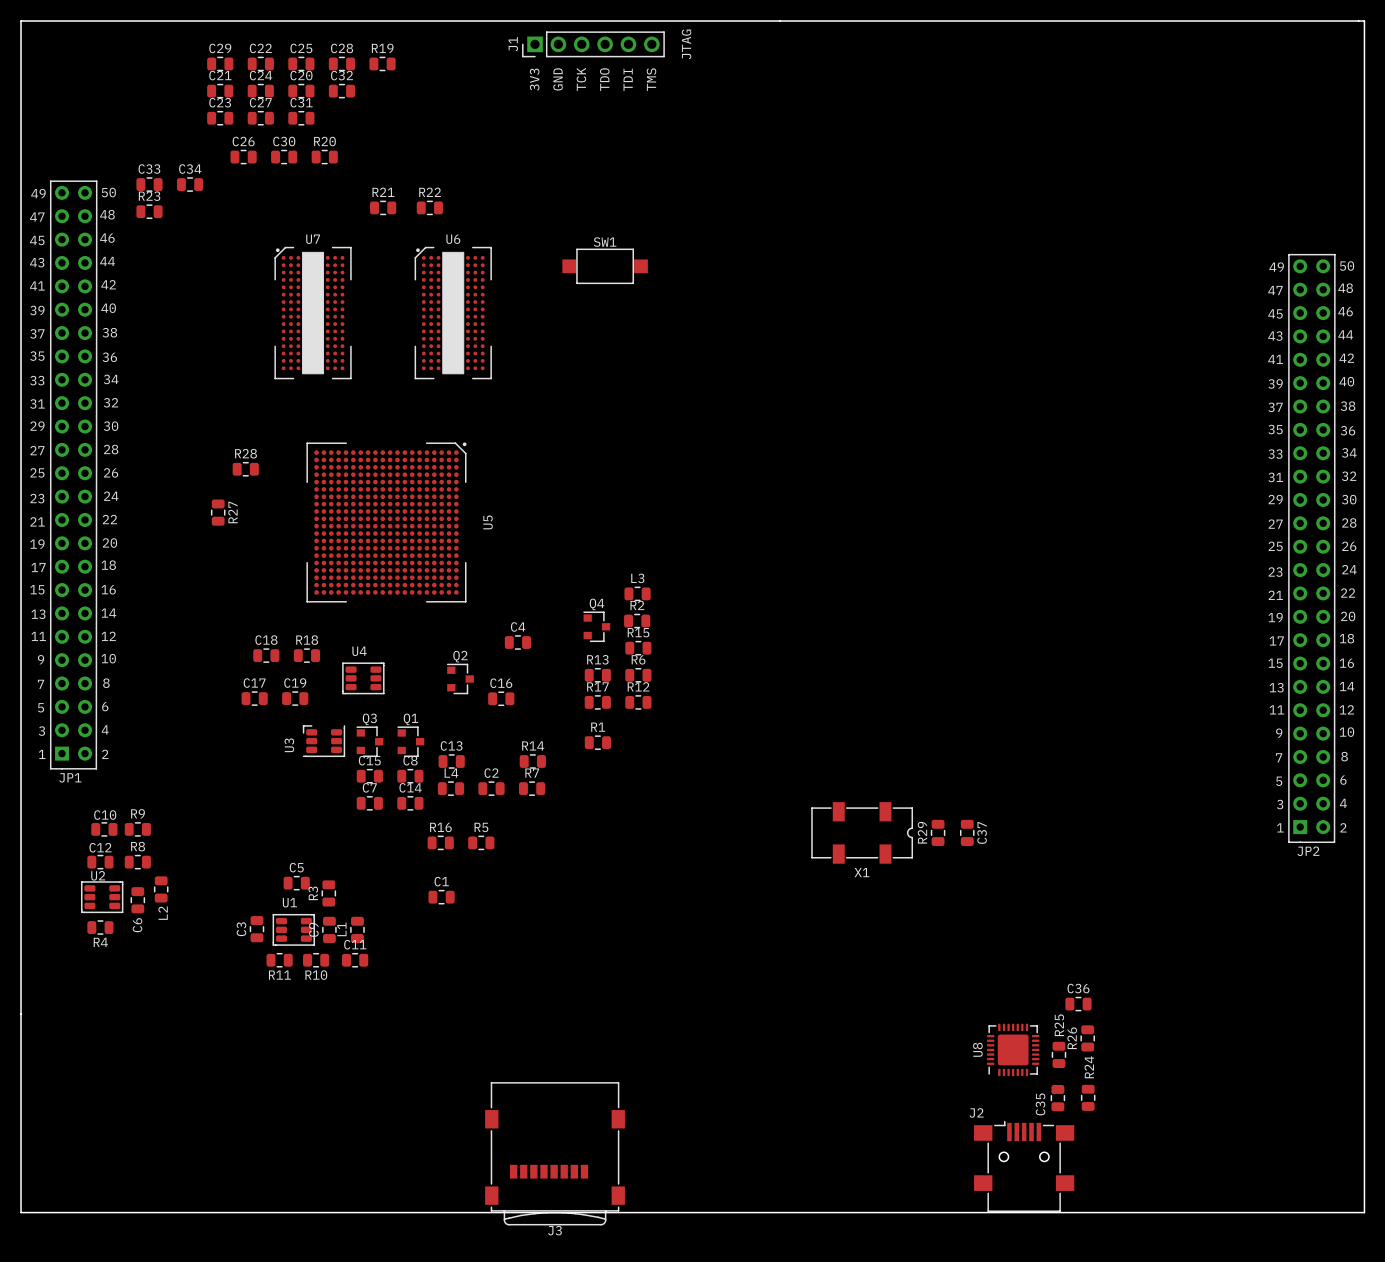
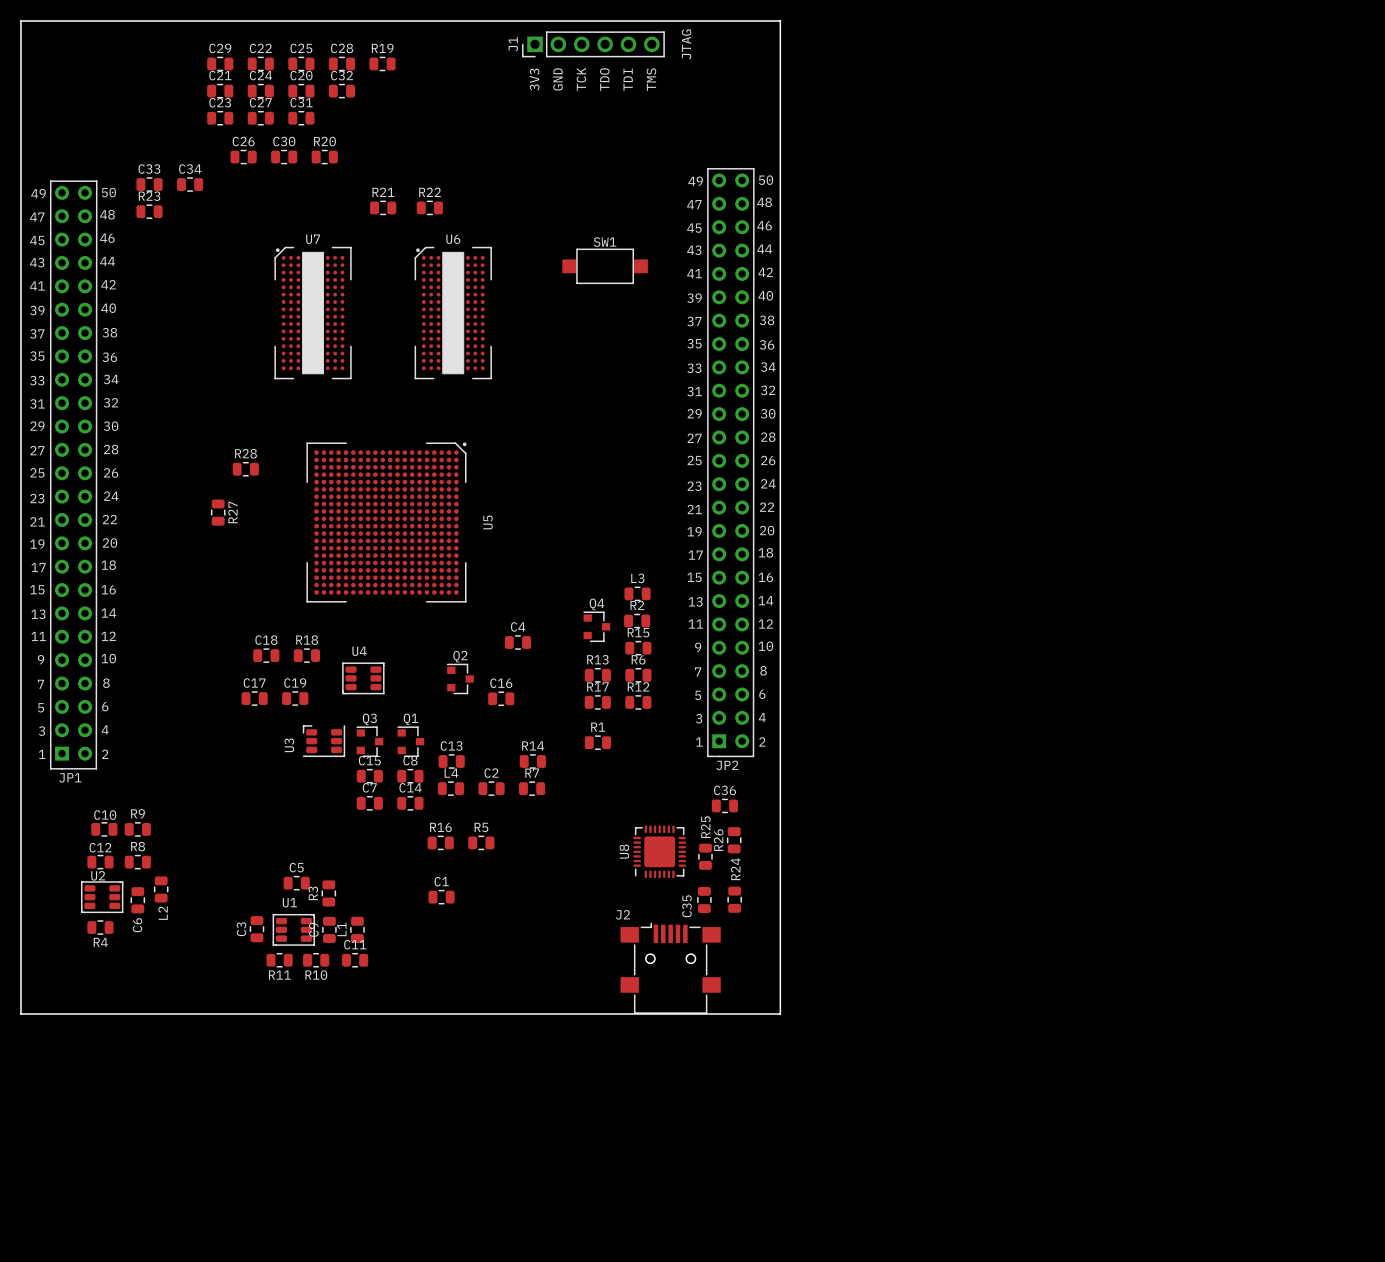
board edge: (780, 21) (1364, 21) (1364, 1212) (21, 1212) (21, 1013) -> (780, 21) (780, 1013) (21, 1013)
JP2 position: (1311, 548) -> (730, 462)
X1: (862, 832) -> none
R29: (938, 832) -> none
C37: (967, 832) -> none
C36 position: (1078, 1004) -> (724, 805)
R26 position: (1087, 1038) -> (734, 840)
U8 position: (1013, 1049) -> (659, 851)
R25 position: (1058, 1054) -> (705, 856)
R24 position: (1088, 1097) -> (734, 899)
C35 position: (1057, 1098) -> (704, 899)
J3: (555, 1153) -> none
J2 position: (1024, 1166) -> (670, 968)

